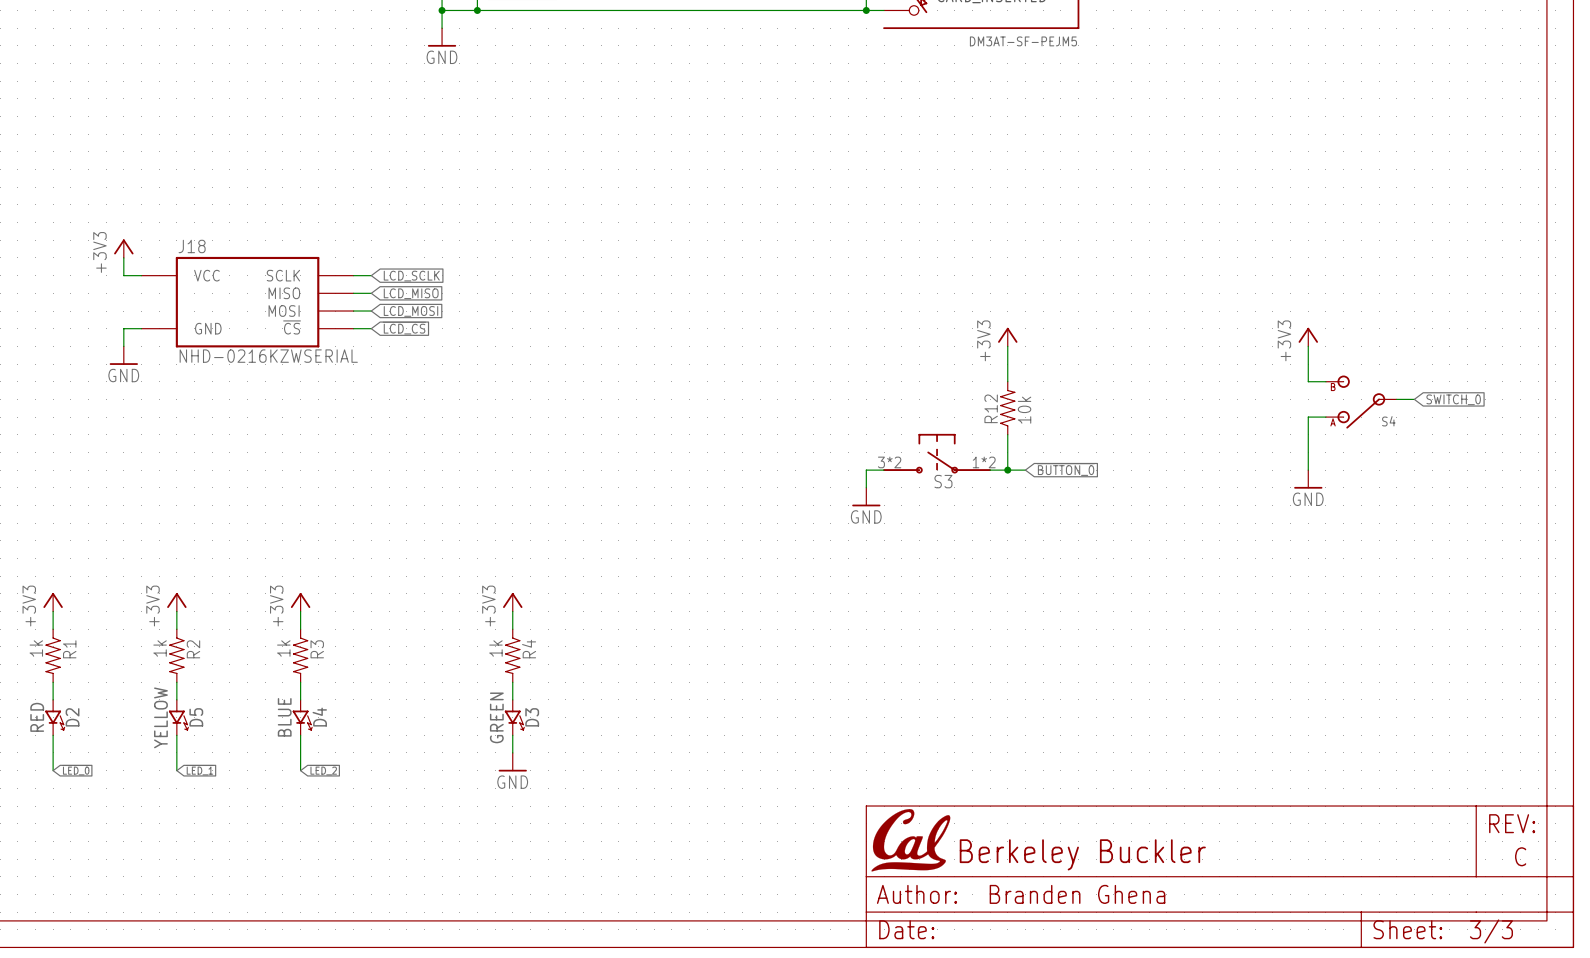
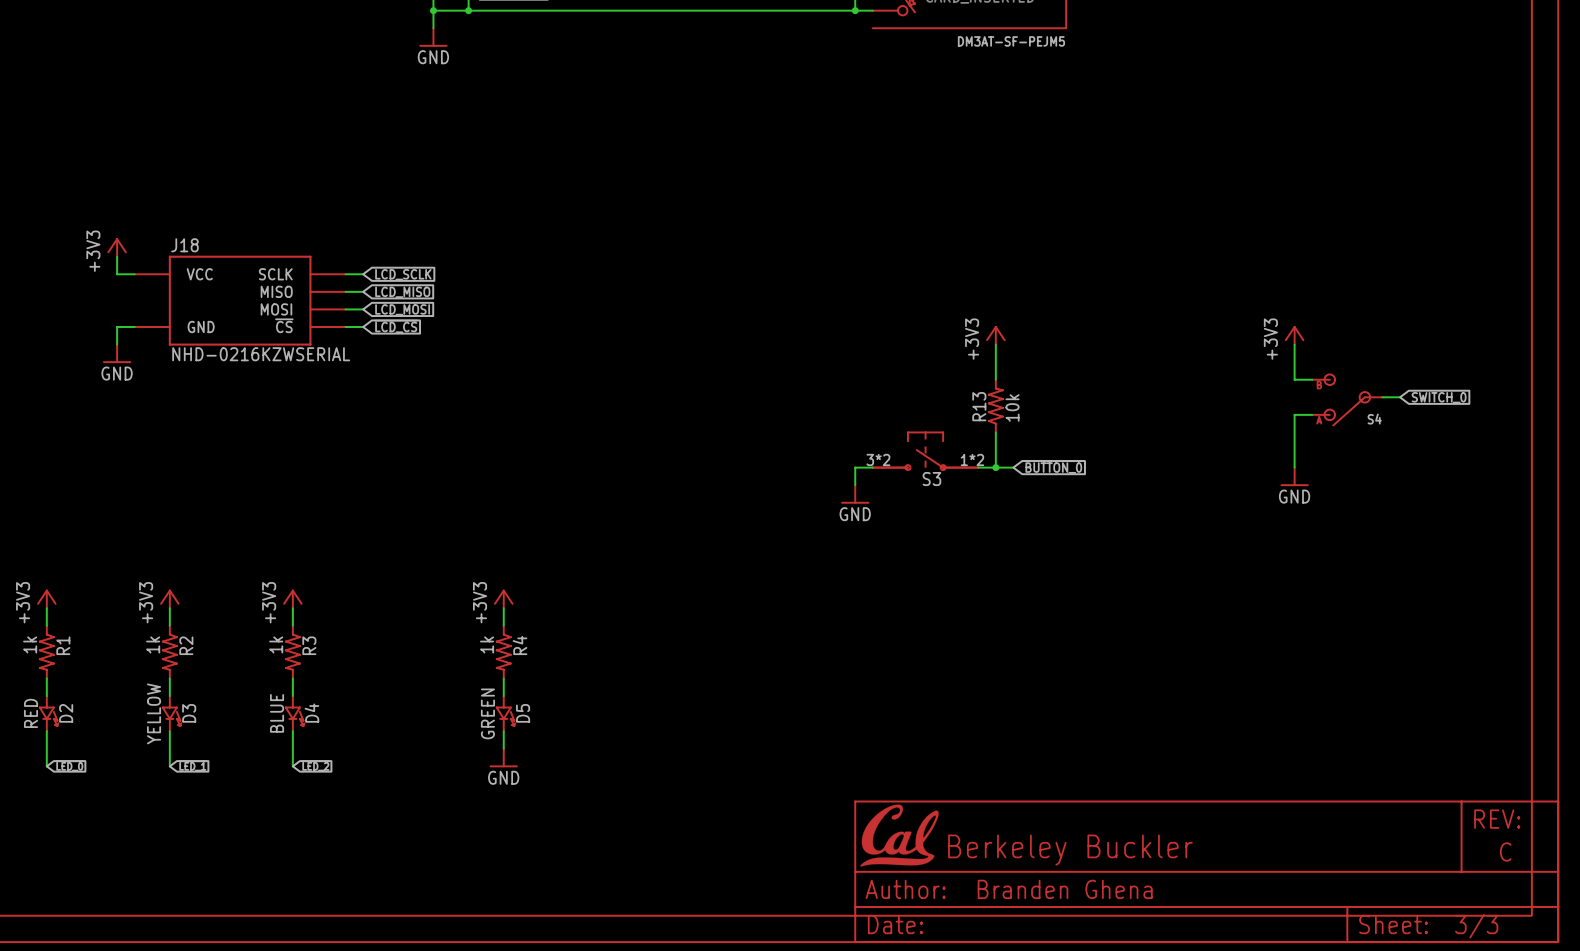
R12 name: R12 (991, 408) -> R13 (979, 406)
D5 name: D5 (196, 717) -> D3 (189, 713)
D3 name: D3 (532, 717) -> D5 (523, 713)

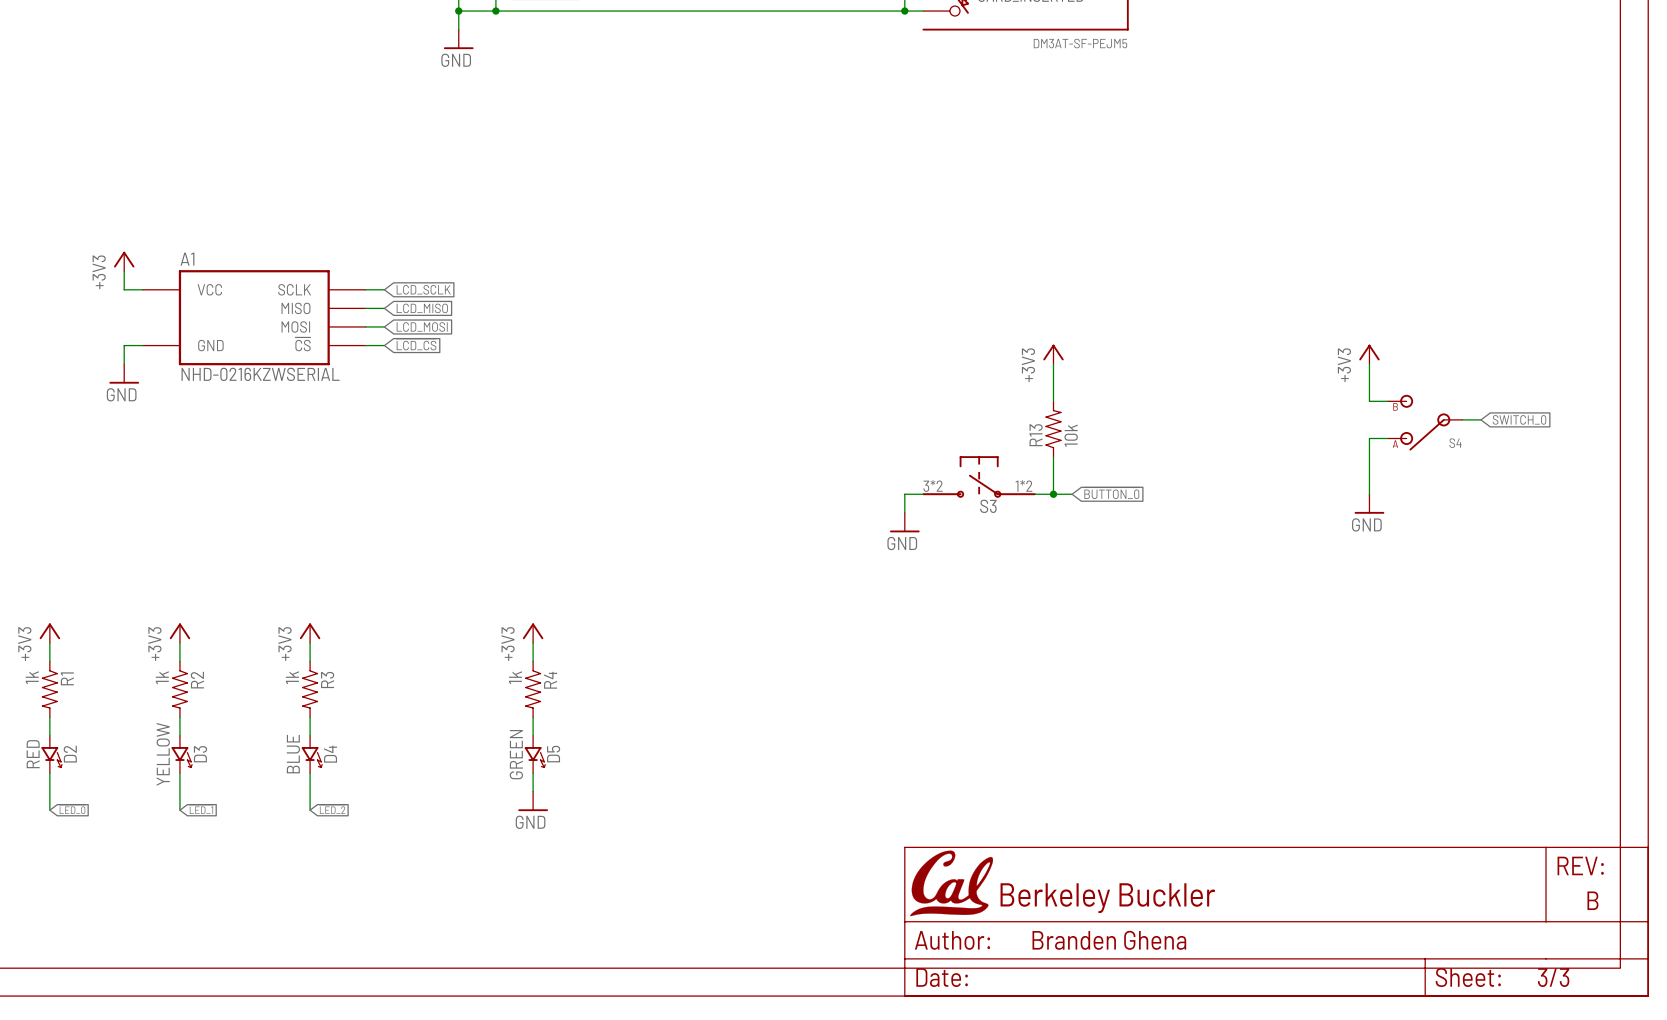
J18 name: J18 (184, 245) -> A1 (187, 259)
part text: C (1505, 851) -> B (1592, 900)

